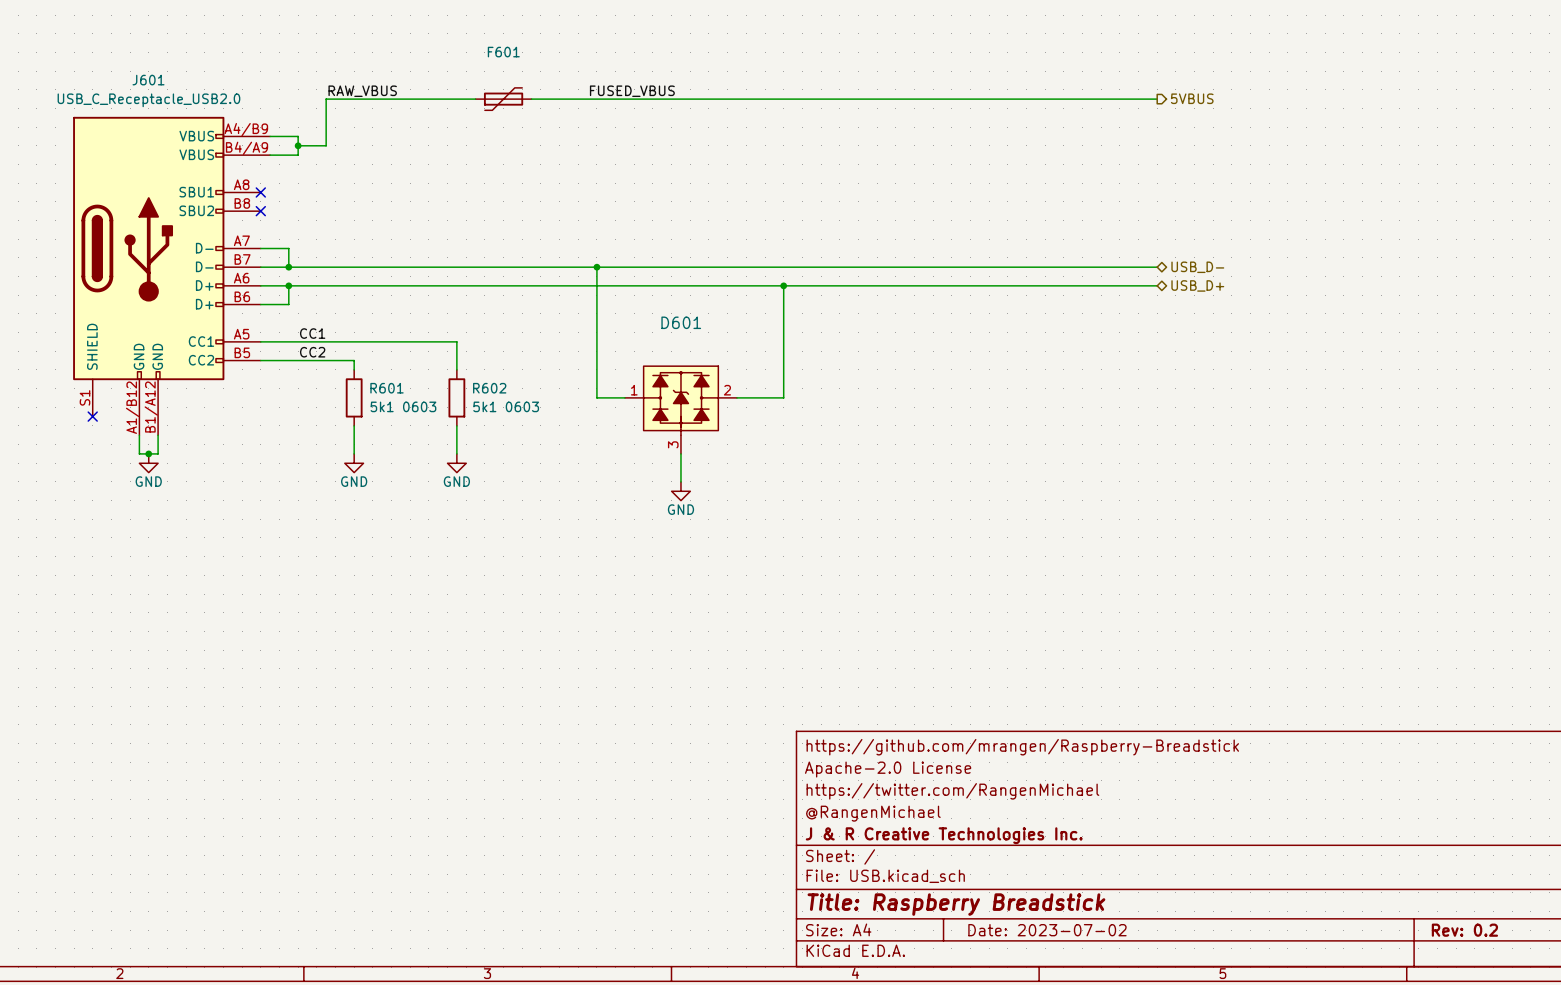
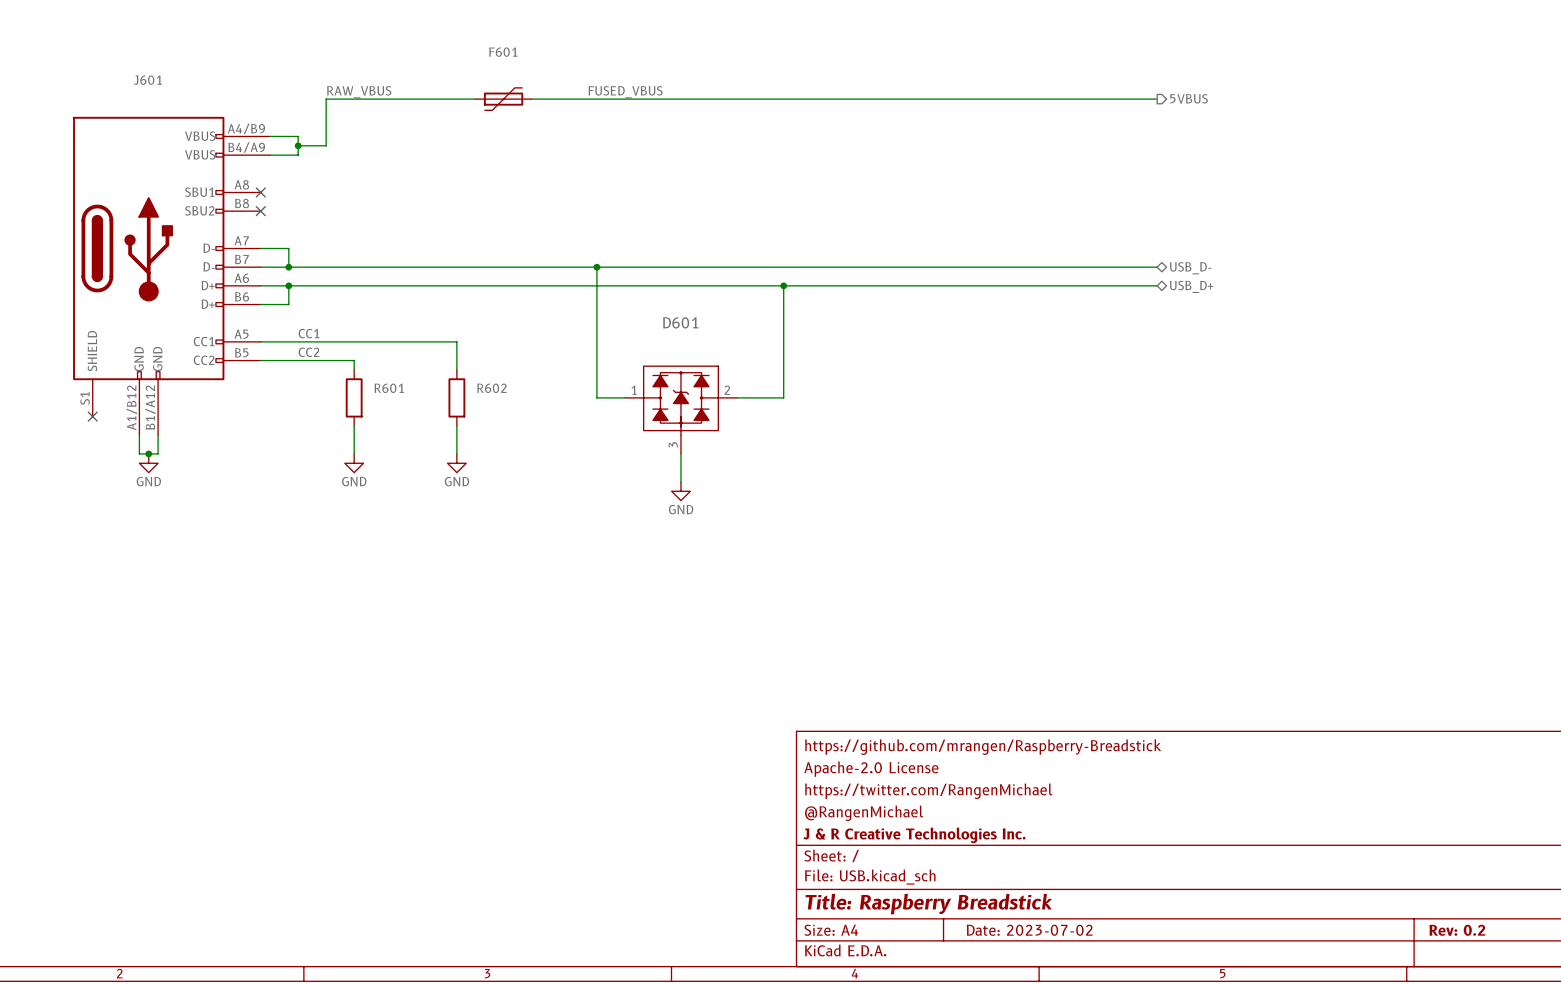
J601 value: USB_C_Receptacle_USB2.0 (148, 100) -> none
R601 value: 5k1 0603 (403, 406) -> none
R602 value: 5k1 0603 (506, 406) -> none

